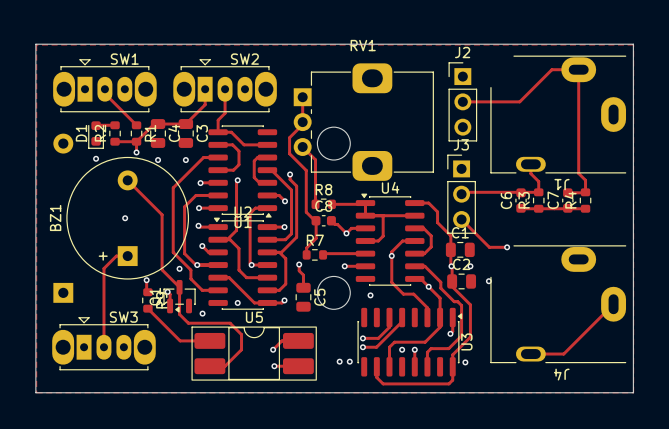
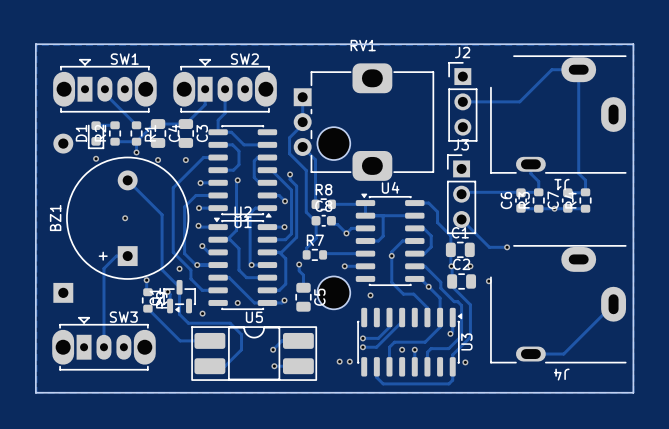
via: none -> (554, 208)

